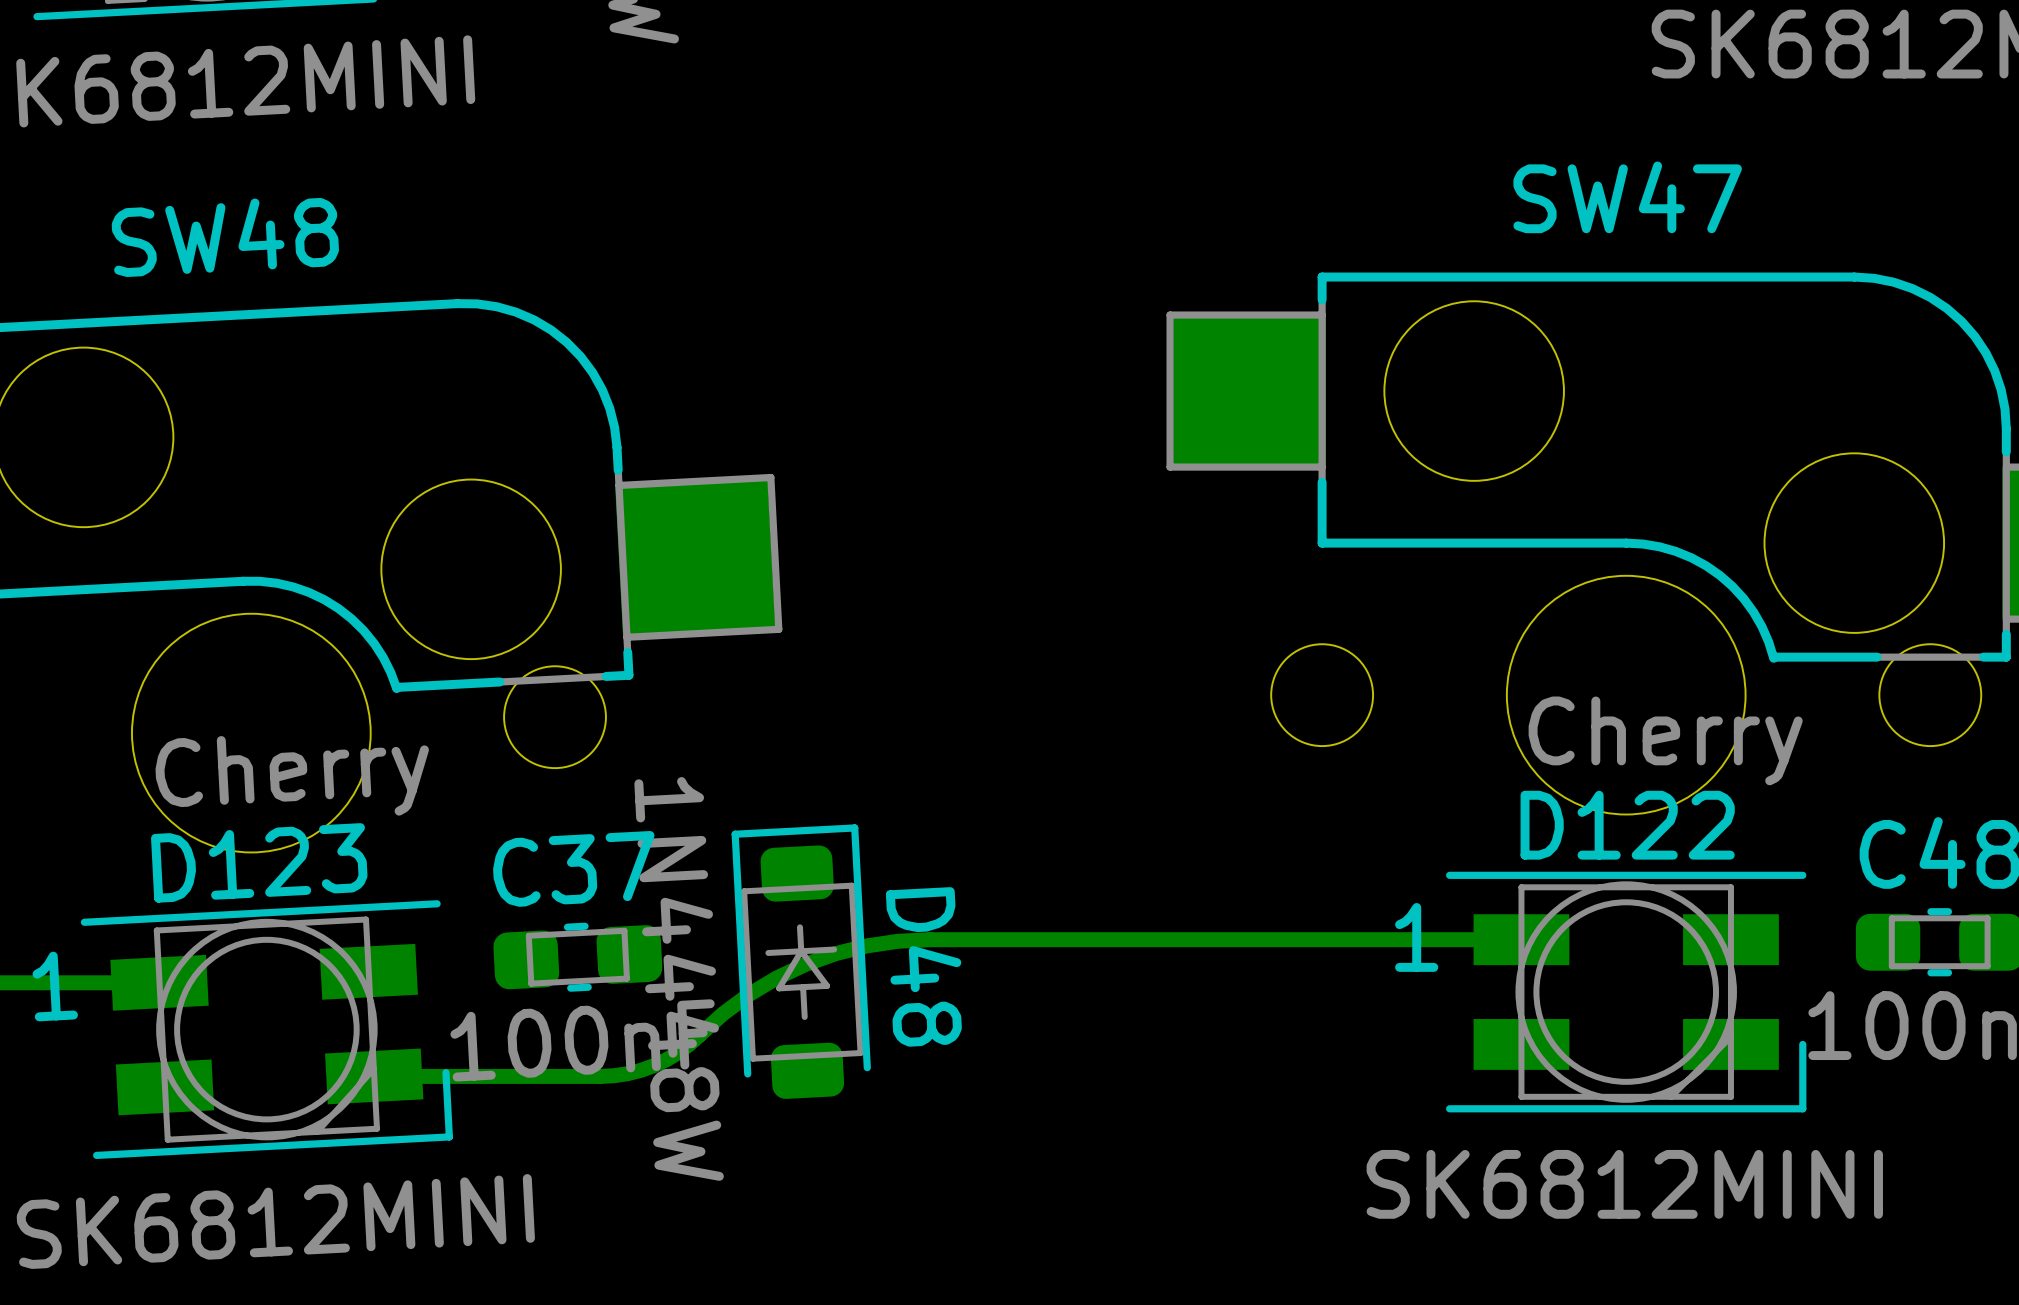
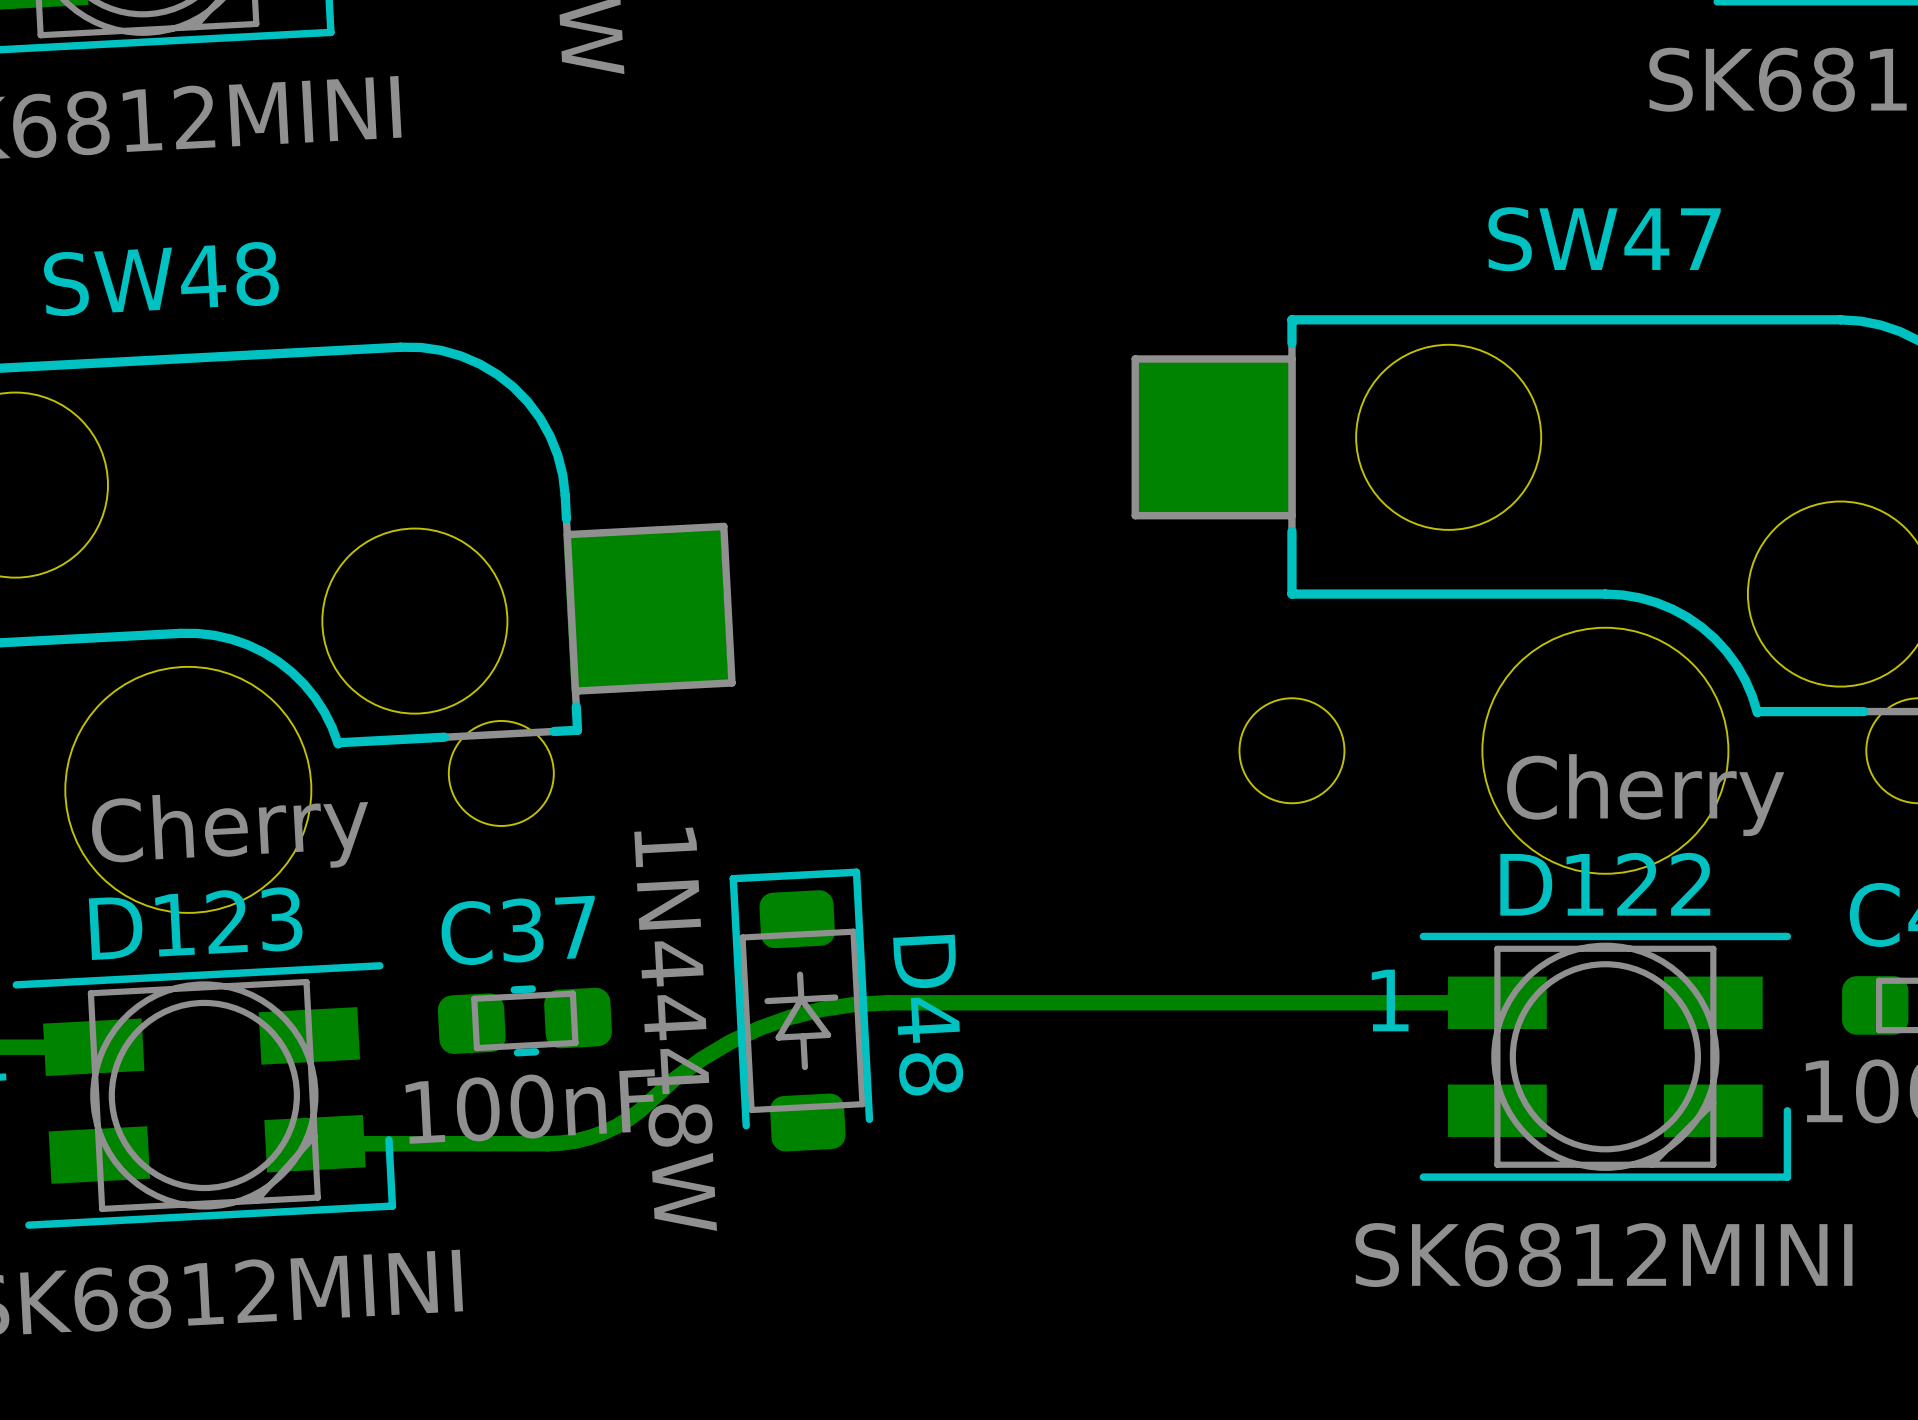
D48 position: (801, 961) -> (801, 1009)

